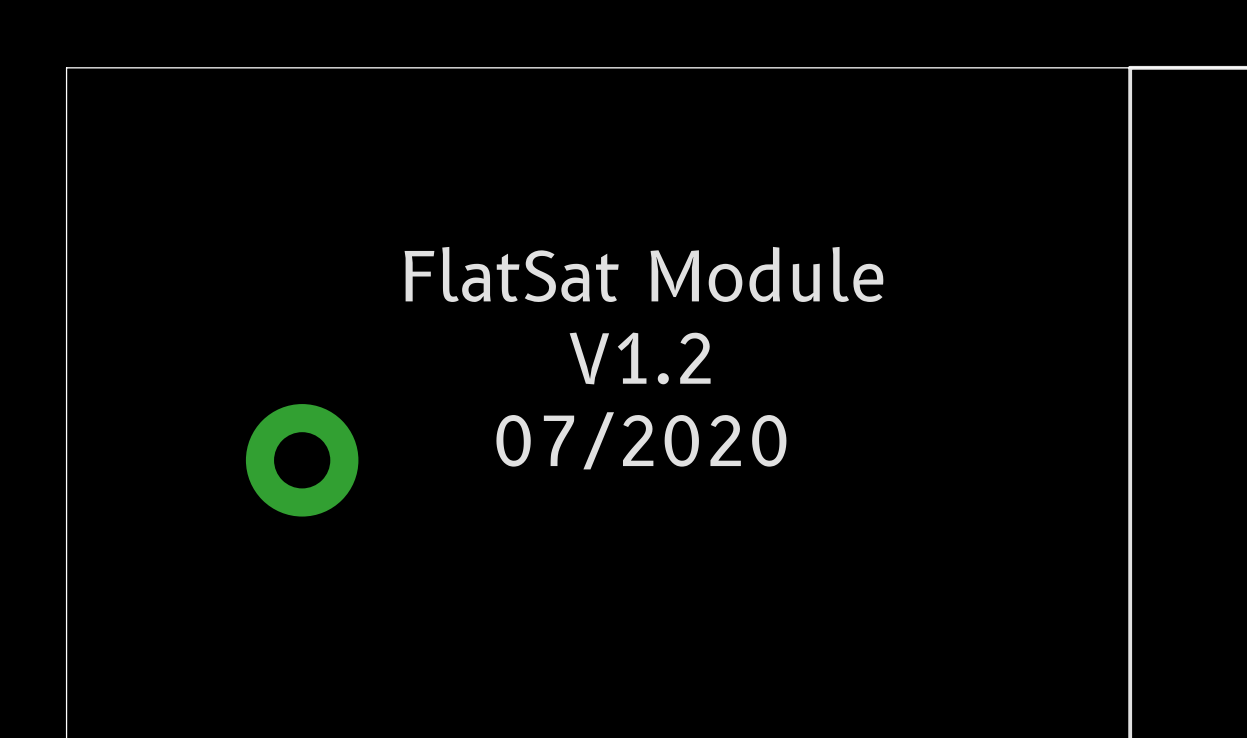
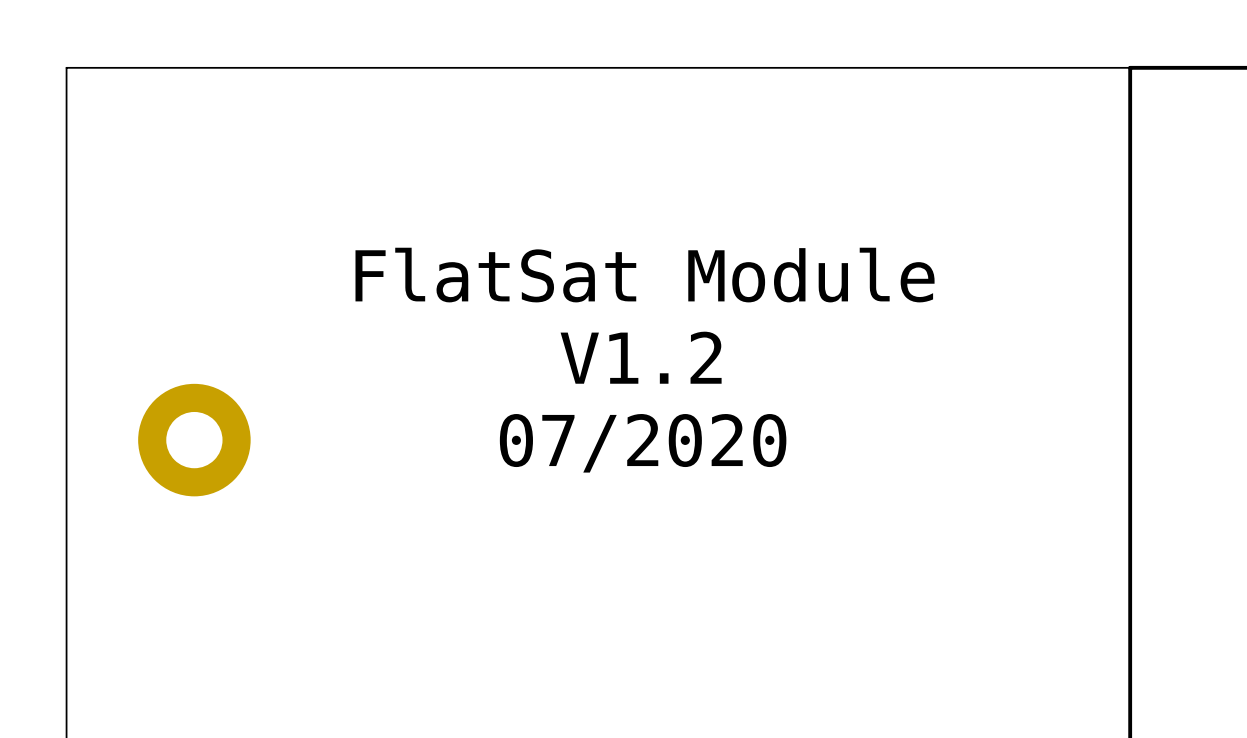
part position: (302, 460) -> (194, 440)

